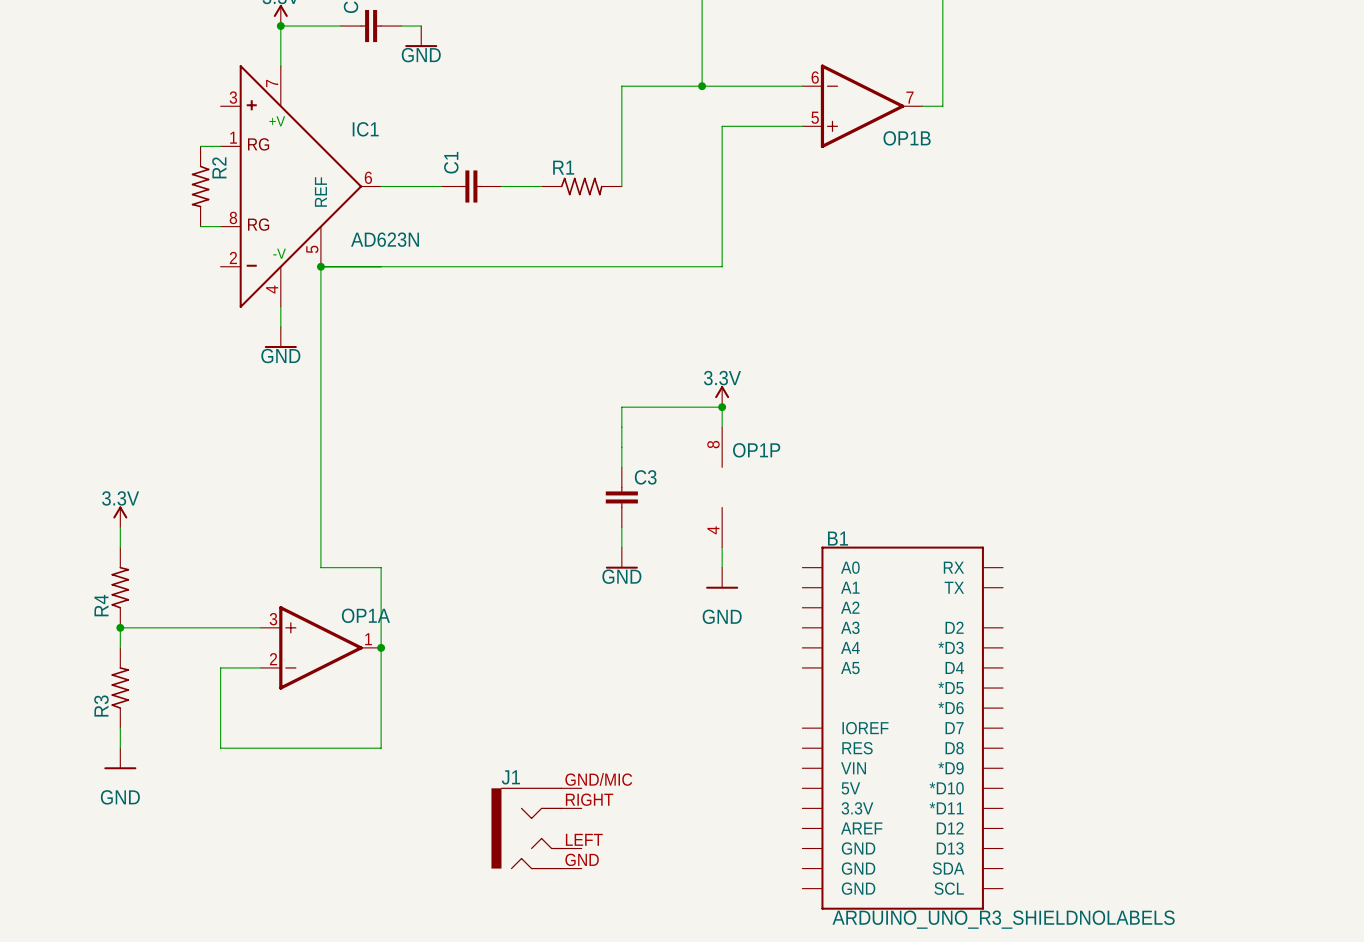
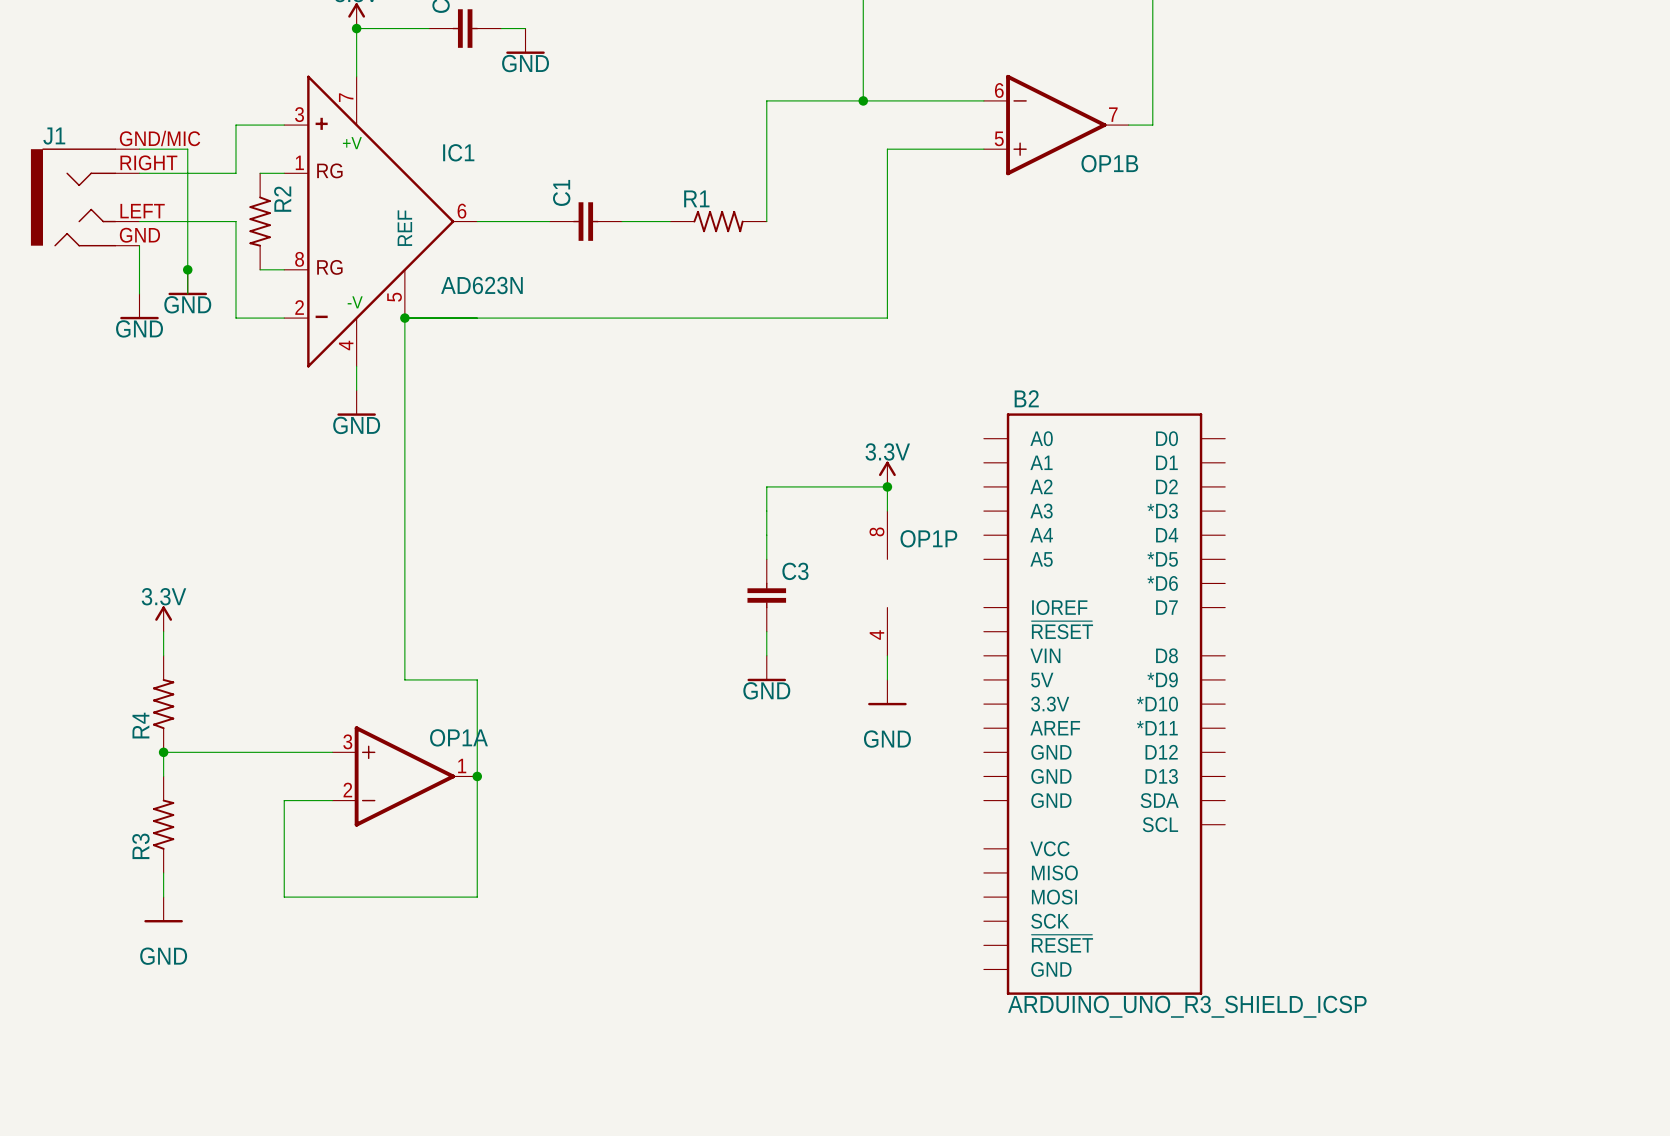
wire: none -> (284, 125) (236, 125) (236, 173) (139, 173)
wire: none -> (139, 149) (187, 149) (187, 293)
wire: none -> (139, 221) (236, 221) (236, 318) (284, 318)
wire: none -> (139, 245) (139, 293)
junction: none -> (187, 269)
power symbol: none -> GND (187, 282)
power symbol: none -> GND (139, 306)
B2: none -> ARDUINO_UNO_R3_SHIELD_ICSP (1104, 704)
B1: ARDUINO_UNO_R3_SHIELDNOLABELS (902, 728) -> none
J1 position: (536, 828) -> (85, 197)

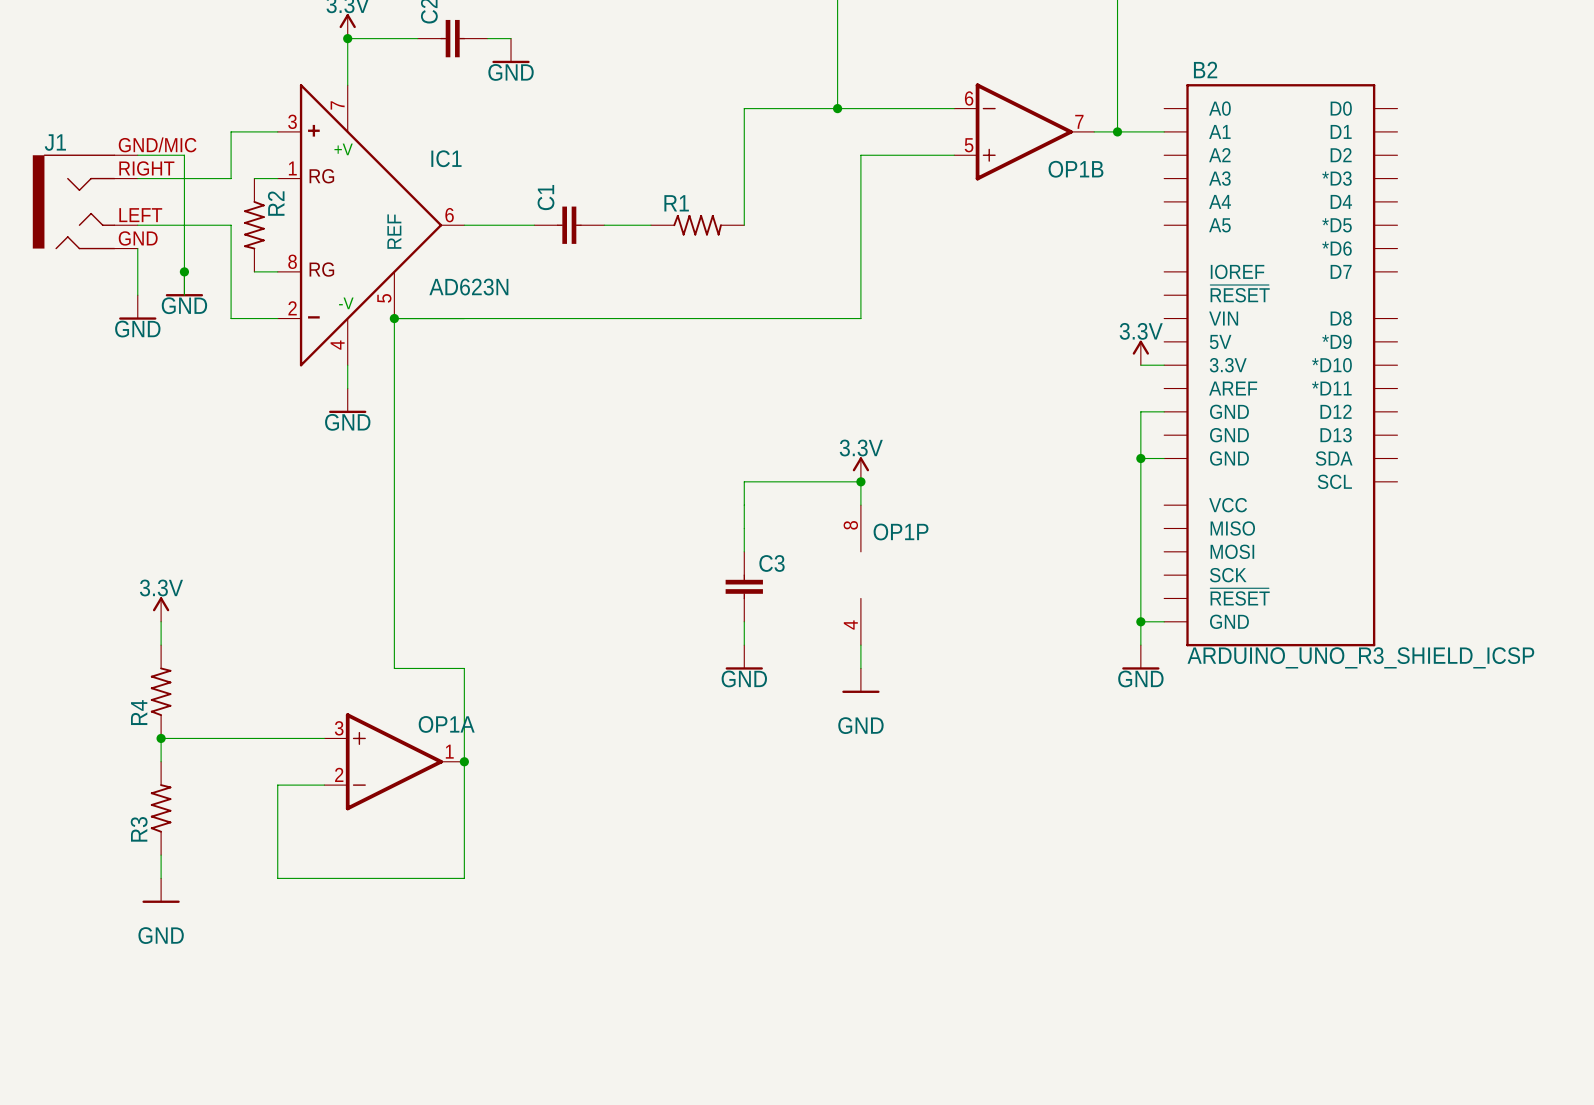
wire: none -> (1117, 131) (1164, 131)
junction: none -> (1117, 131)
power symbol: none -> 3.3V (1140, 352)
wire: none -> (1140, 365) (1164, 365)
wire: none -> (1164, 411) (1140, 411) (1140, 645)
wire: none -> (1140, 458) (1164, 458)
junction: none -> (1140, 458)
wire: none -> (1140, 621) (1164, 621)
junction: none -> (1140, 621)
power symbol: none -> GND (1140, 657)
B2 position: (1104, 704) -> (1280, 365)

